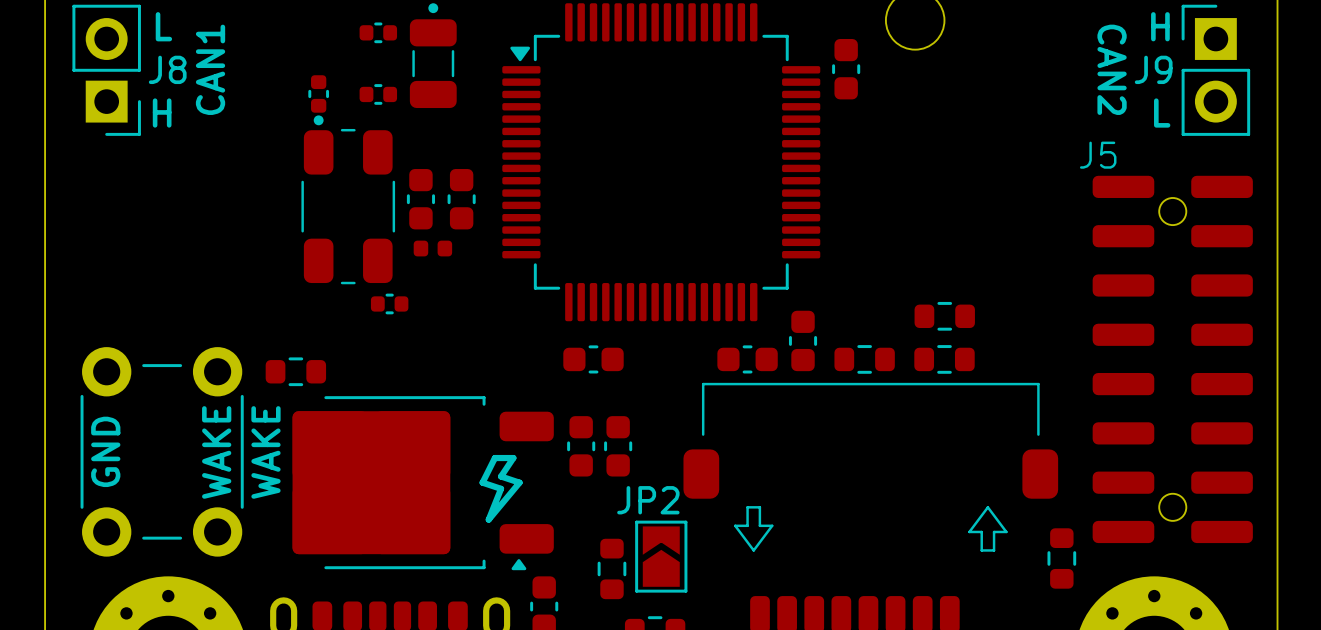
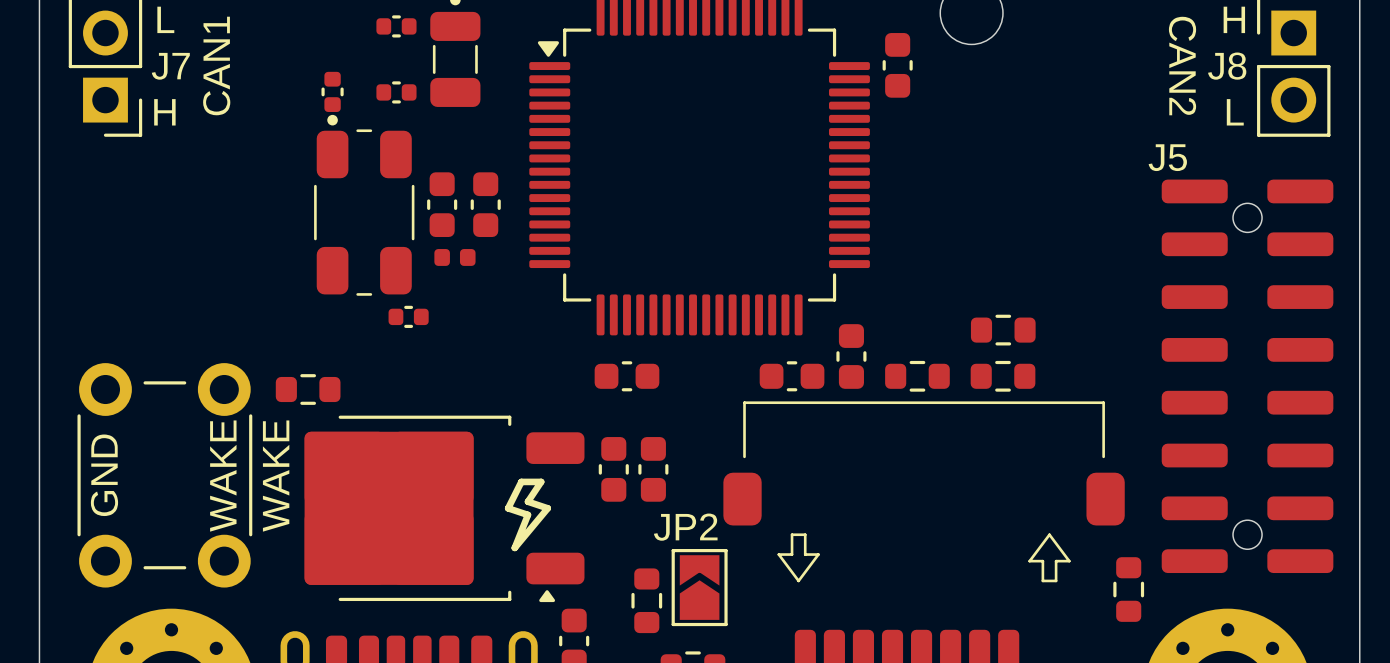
J8 name: J8 (167, 69) -> J7 (170, 66)
J9 name: J9 (1153, 69) -> J8 (1227, 66)

